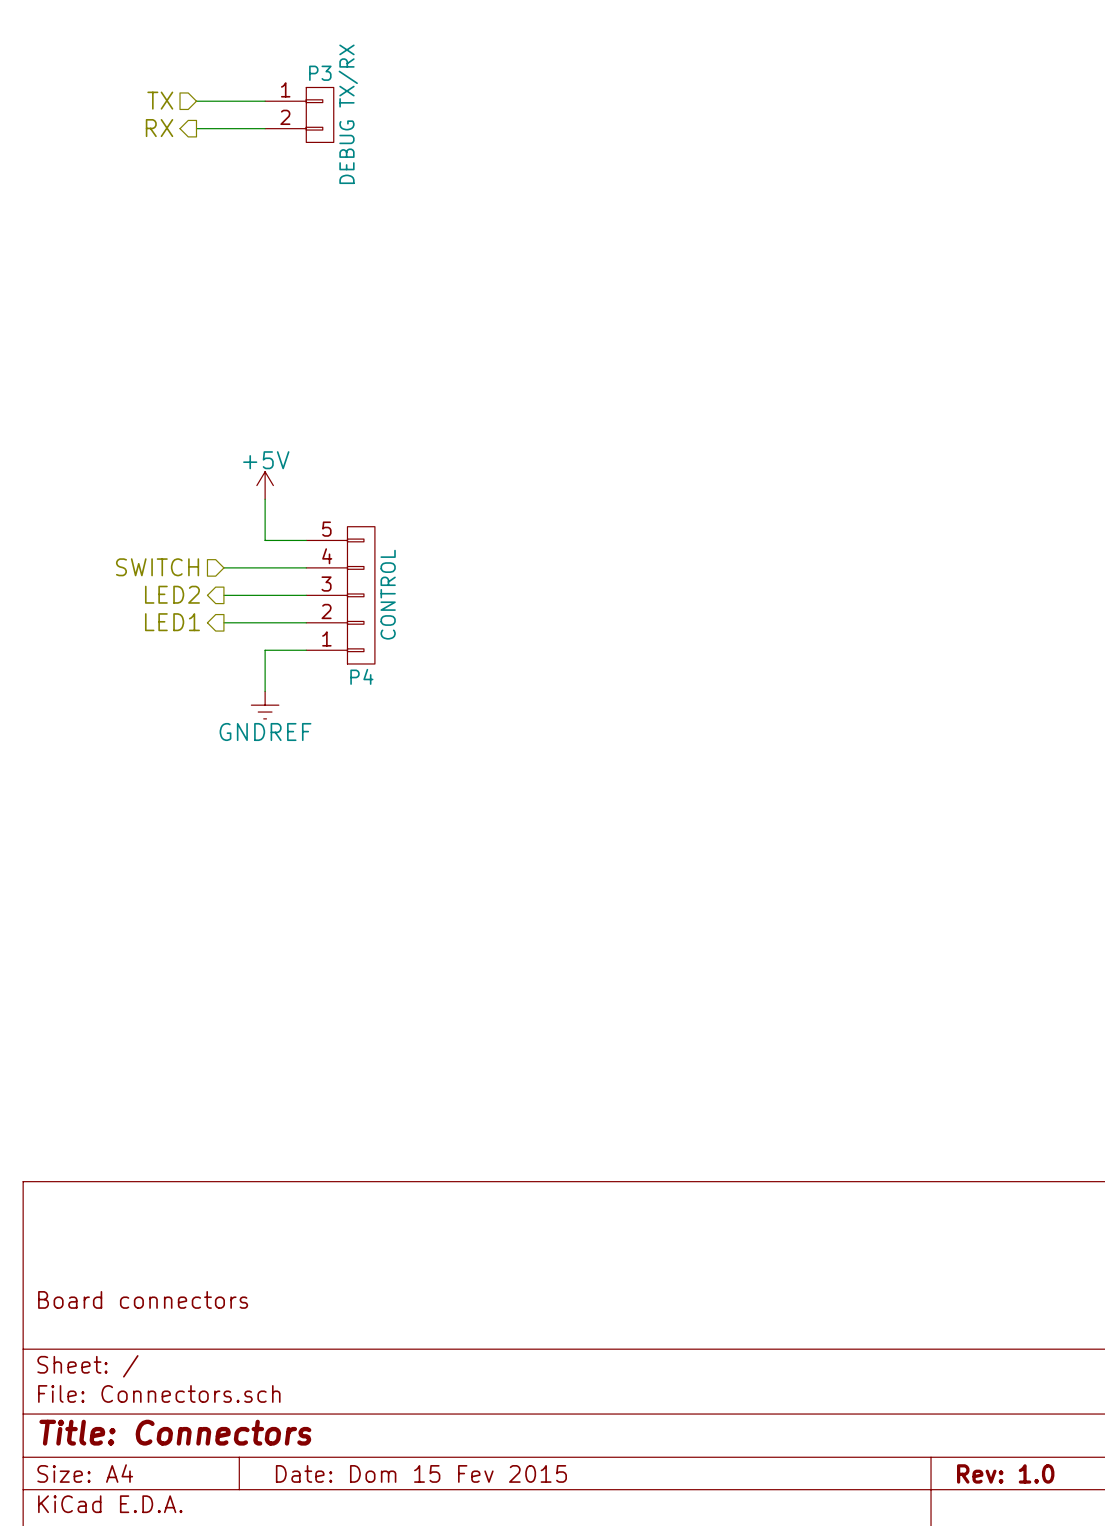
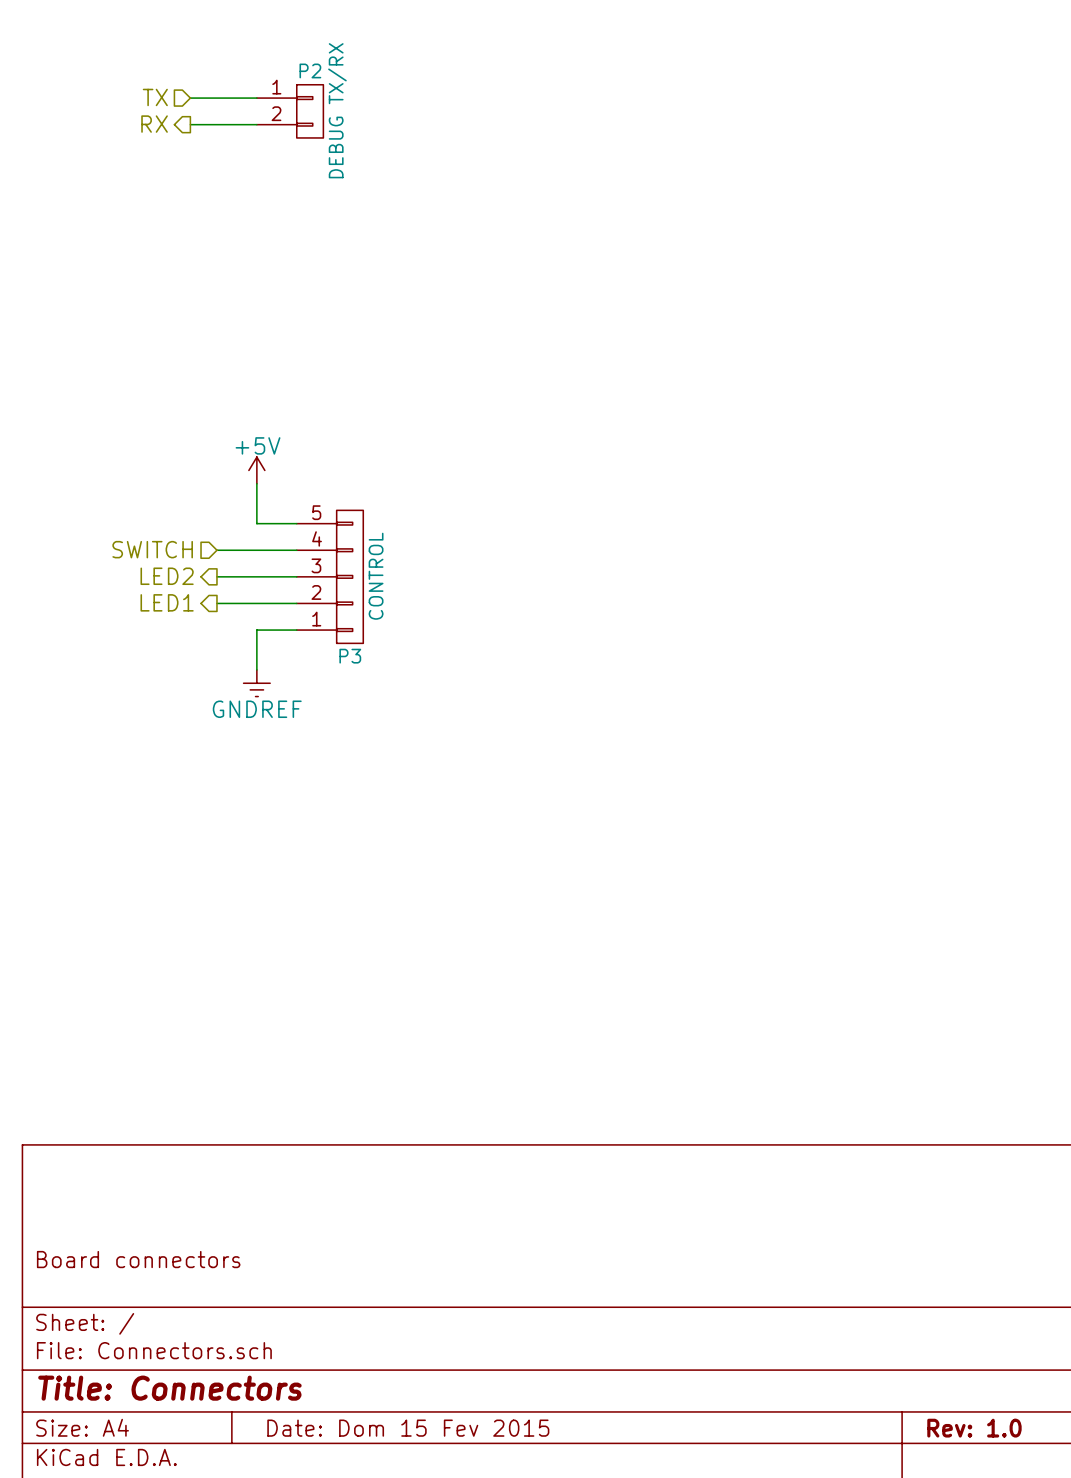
P3 name: P3 (320, 73) -> P2 (310, 70)
P4 name: P4 (361, 676) -> P3 (350, 656)

